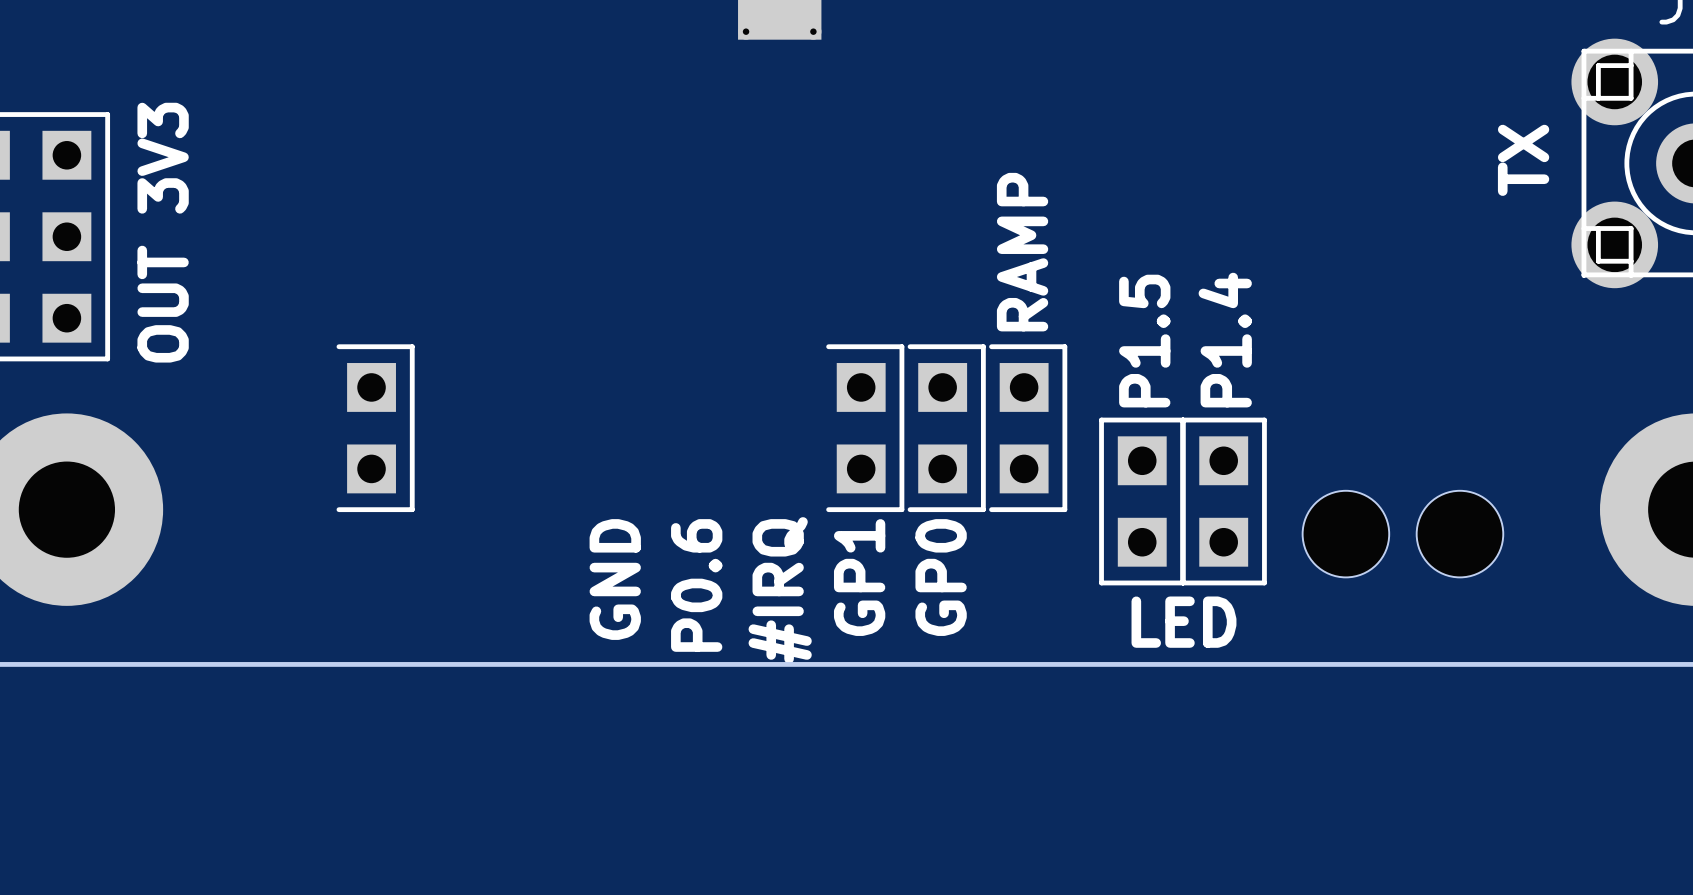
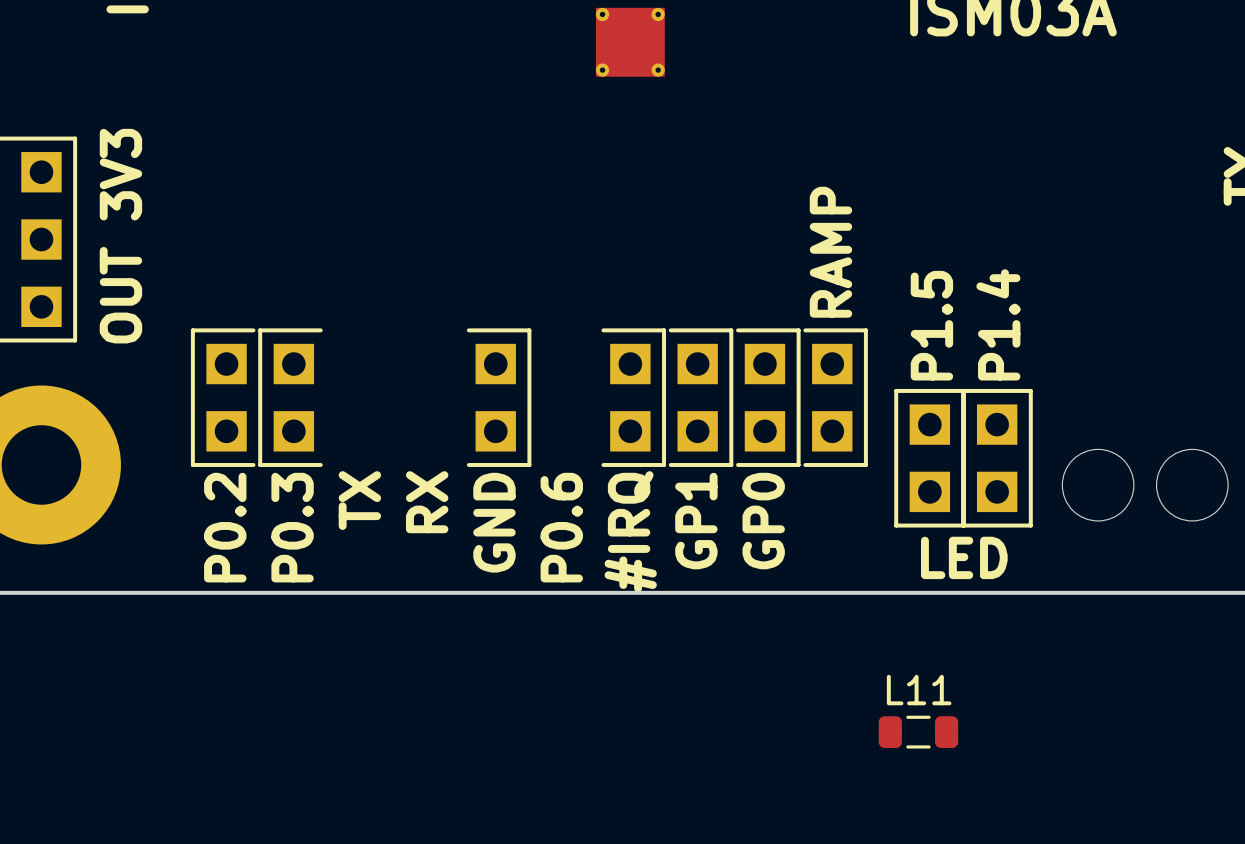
part: none -> (223, 397)
part rotation: 0° (375, 428) -> 180° (290, 397)
part: none -> (499, 397)
part: none -> (633, 397)
text: none -> TX (359, 500)
text: none -> RX (427, 502)
text: none -> P0.2 (225, 527)
text: none -> P0.3 (292, 527)
L11: none -> (918, 732)

